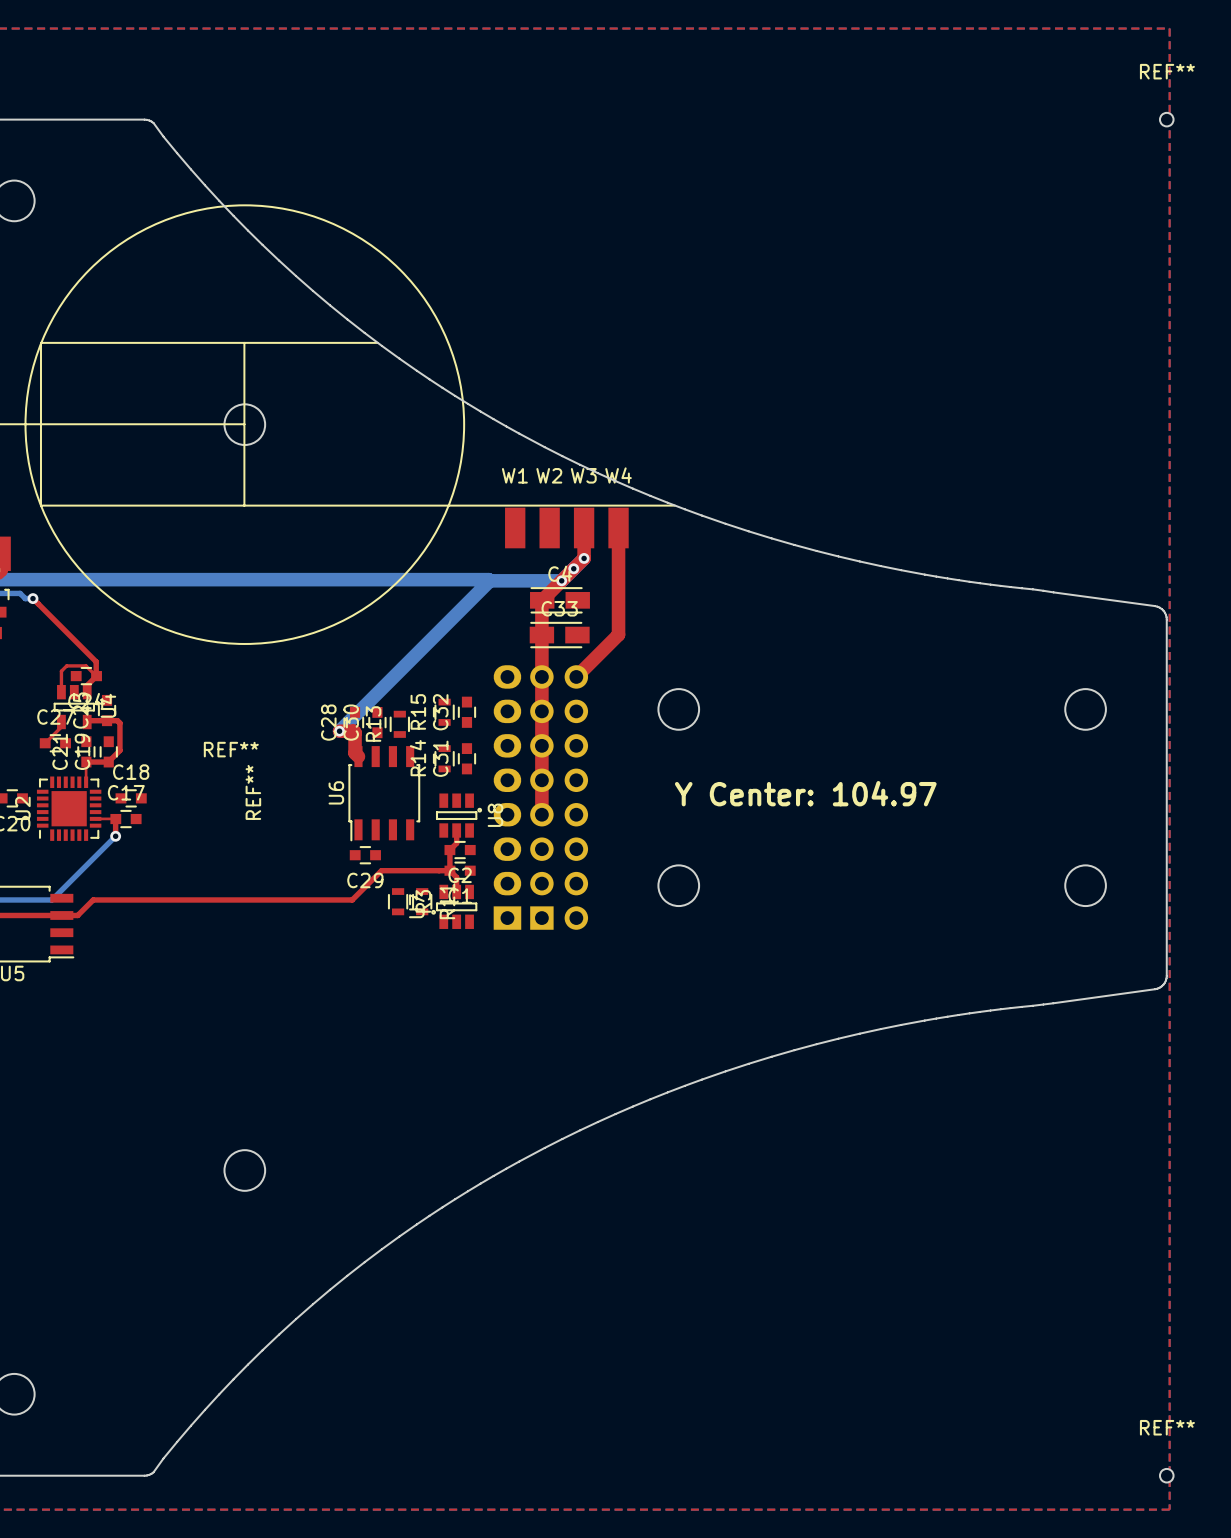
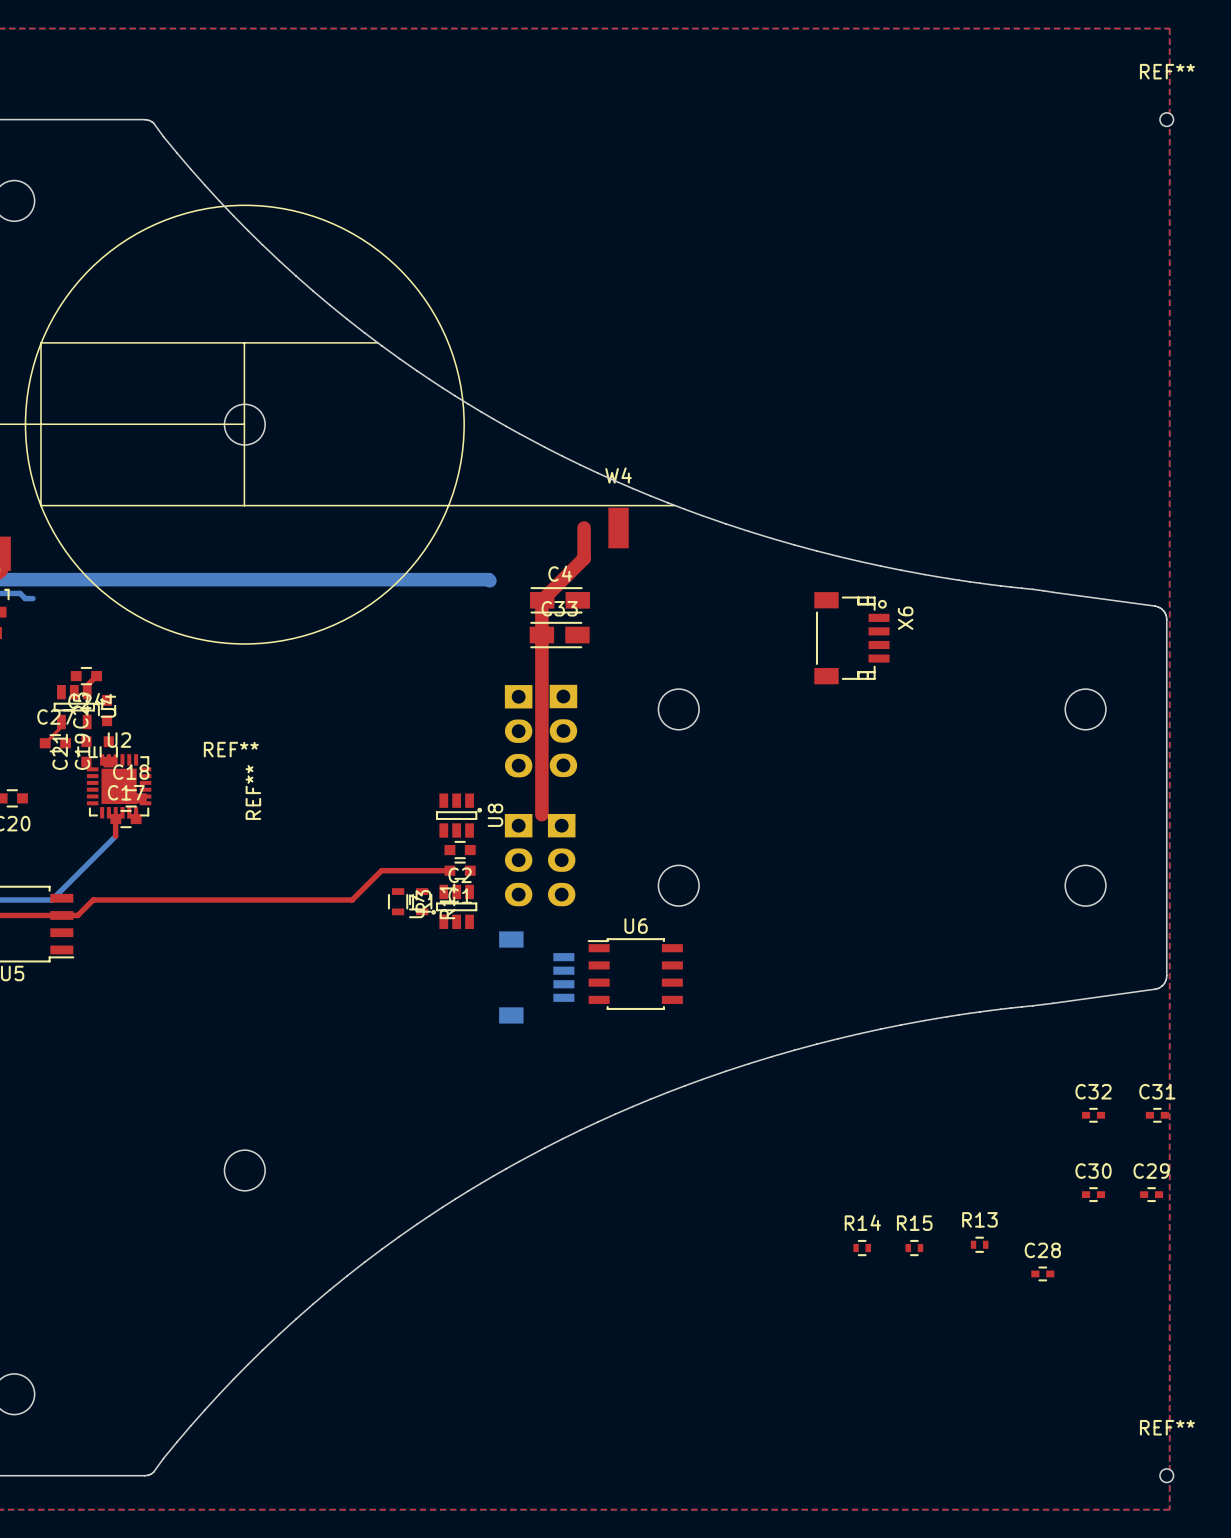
W1: (515, 527) -> none
W2: (549, 527) -> none
W3: (584, 527) -> none
top track: (618, 527) (618, 634) (576, 676) -> none
bottom track: (584, 558) (561, 580) (489, 580) (339, 731) -> none
via: (584, 558) -> none
via: (573, 568) -> none
via: (561, 580) -> none
top track: (32, 598) (96, 661) (96, 676) (86, 665) (66, 665) (61, 671) (61, 692) -> none
via: (32, 598) -> none
X6: none -> (851, 638)
C32 footprint: [457, 696, 477, 728] -> [1081, 1107, 1106, 1123]
R15 footprint: [434, 698, 455, 726] -> [905, 1239, 924, 1257]
C28 footprint: [345, 707, 365, 739] -> [1031, 1266, 1055, 1282]
C30 footprint: [368, 707, 387, 739] -> [1081, 1187, 1106, 1203]
R13 footprint: [389, 710, 410, 738] -> [970, 1236, 989, 1253]
R15 name position: R15 (418, 711) -> R15 (914, 1223)
C32 name position: C32 (440, 712) -> C32 (1093, 1091)
top track: (87, 722) (117, 720) (119, 723) (119, 750) (108, 762) (86, 762) (86, 782) -> none
C28 name position: C28 (328, 722) -> C28 (1042, 1250)
C30 name position: C30 (351, 722) -> C30 (1093, 1171)
R13 name position: R13 (373, 723) -> R13 (979, 1219)
part: none -> (563, 730)
top track: (339, 731) (355, 732) (355, 753) (358, 756) -> none
via: (339, 731) -> none
part: none -> (518, 731)
C31 footprint: [457, 743, 477, 775] -> [1145, 1107, 1169, 1123]
R14 footprint: [434, 745, 455, 773] -> [853, 1239, 872, 1257]
R14 name position: R14 (418, 758) -> R14 (862, 1222)
C31 name position: C31 (440, 758) -> C31 (1157, 1091)
U6 rotation: 0° (384, 793) -> 90° clockwise (635, 974)
U6 position: (384, 793) -> (635, 974)
text: Y Center: 104.97 (805, 793) -> none
part: (507, 797) -> none
part: (559, 797) -> none
U2 rotation: 0° (69, 808) -> 90° clockwise (119, 786)
U2 position: (69, 808) -> (119, 786)
top track: (95, 818) (115, 818) -> none
top track: (456, 830) (456, 843) (449, 850) (449, 870) (456, 877) (456, 891) -> none
via: (115, 836) -> none
C29 footprint: [349, 846, 381, 865] -> [1140, 1187, 1164, 1203]
part: none -> (518, 860)
part: none -> (561, 860)
C29 name position: C29 (365, 880) -> C29 (1151, 1171)
part: none -> (536, 977)

